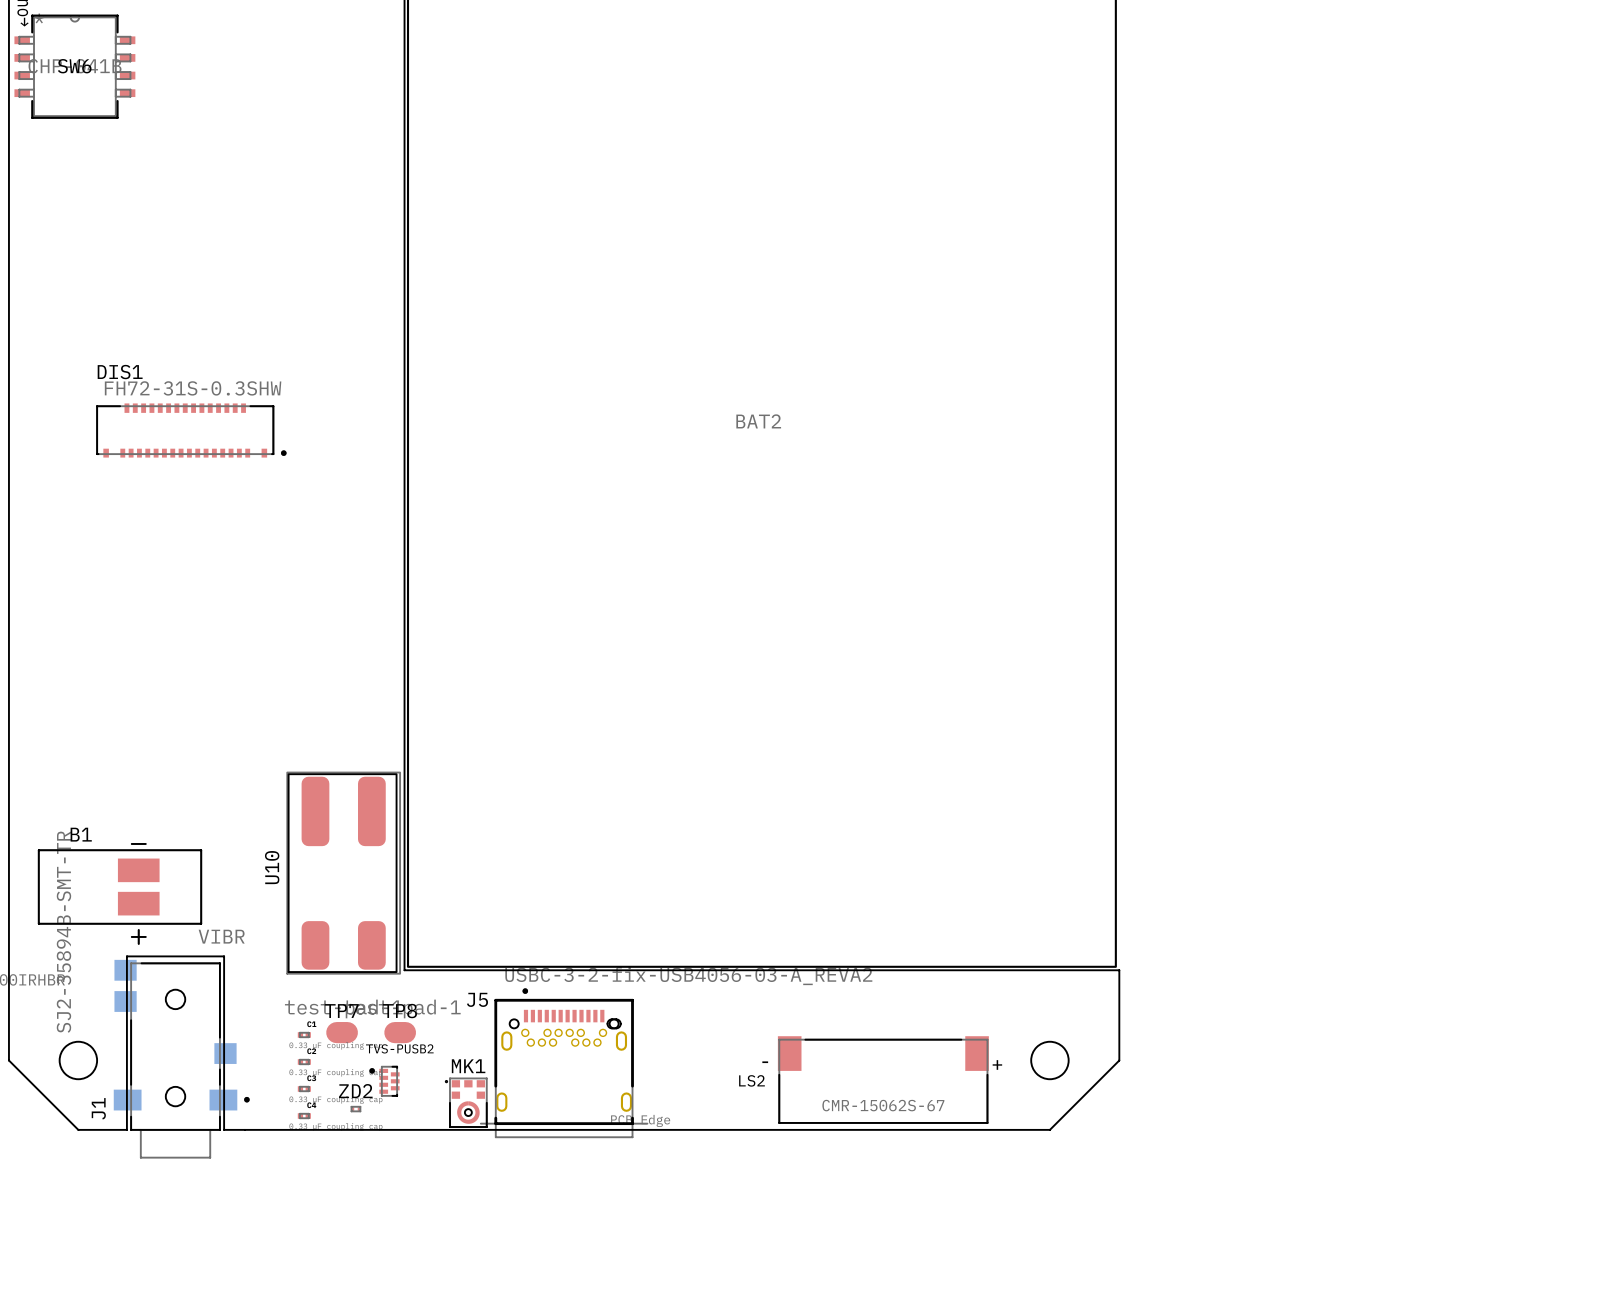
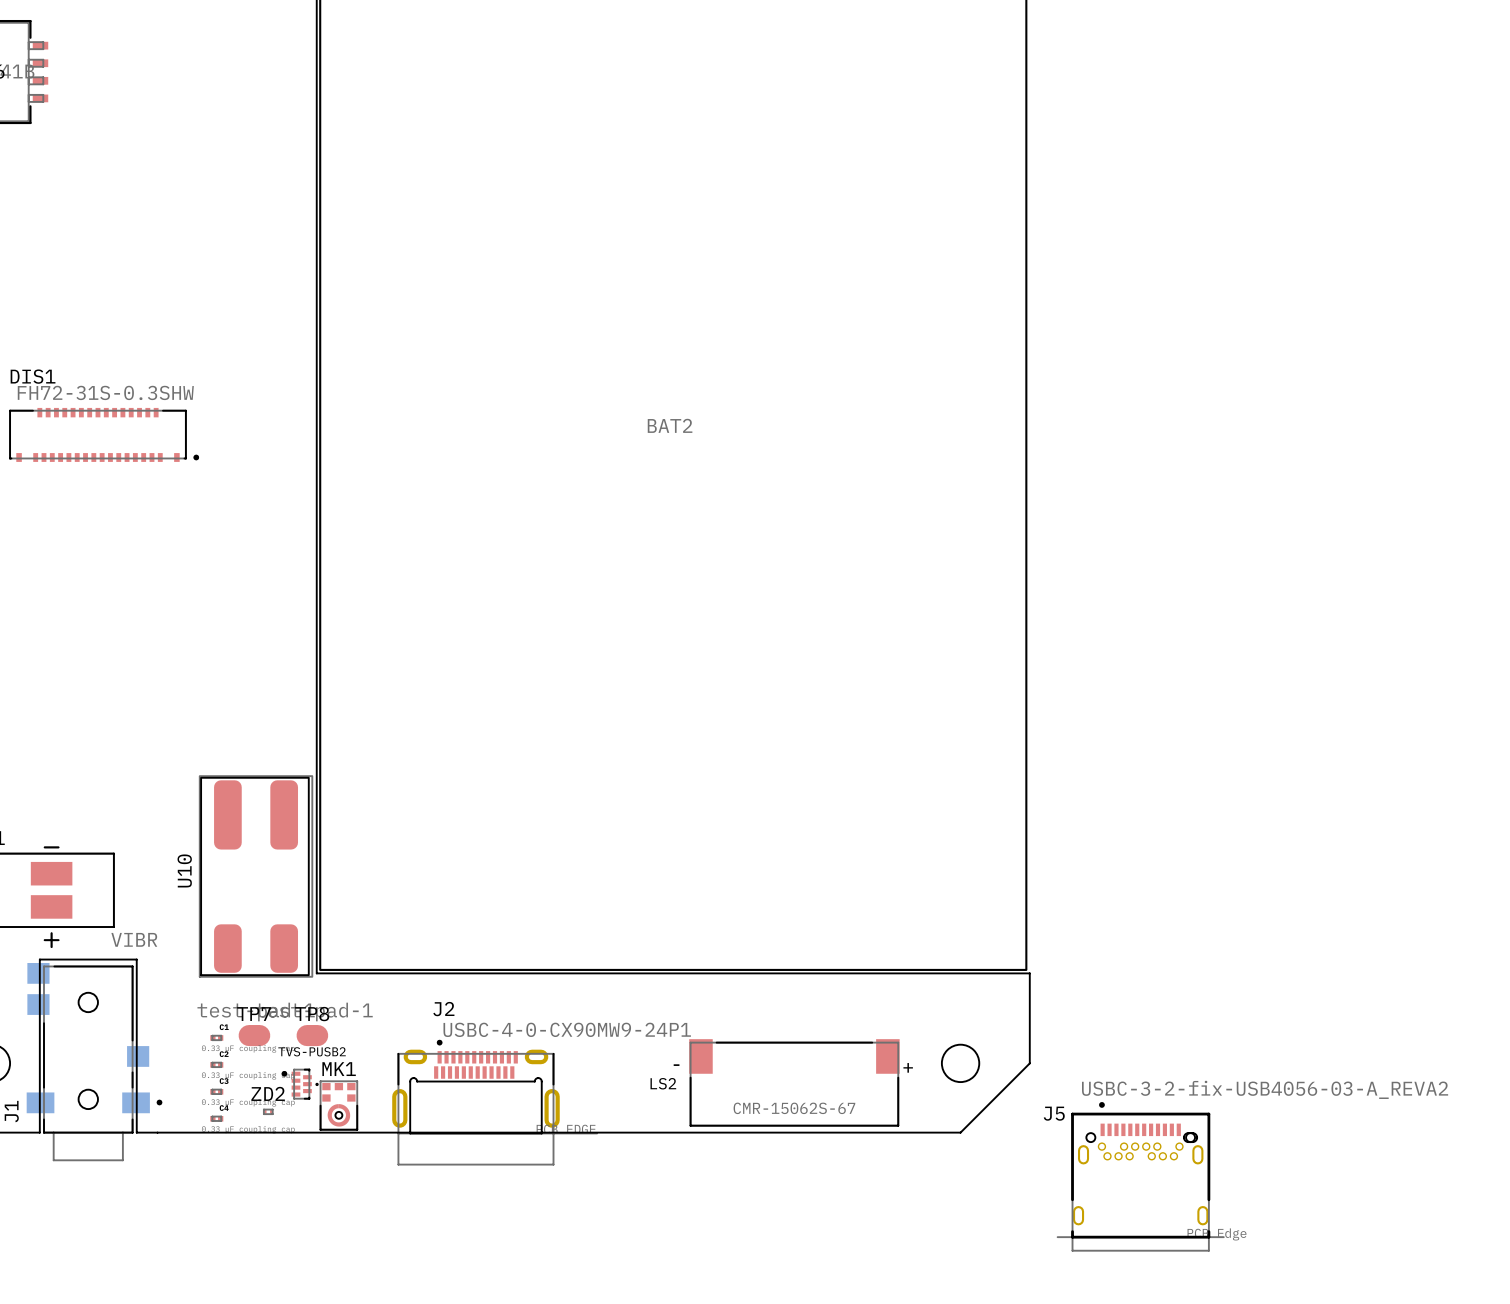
J5 position: (564, 1063) -> (1140, 1176)
J2: none -> USBC-4-0-CX90MW9-24P1 (495, 1102)
MK1 position: (466, 1102) -> (336, 1105)

